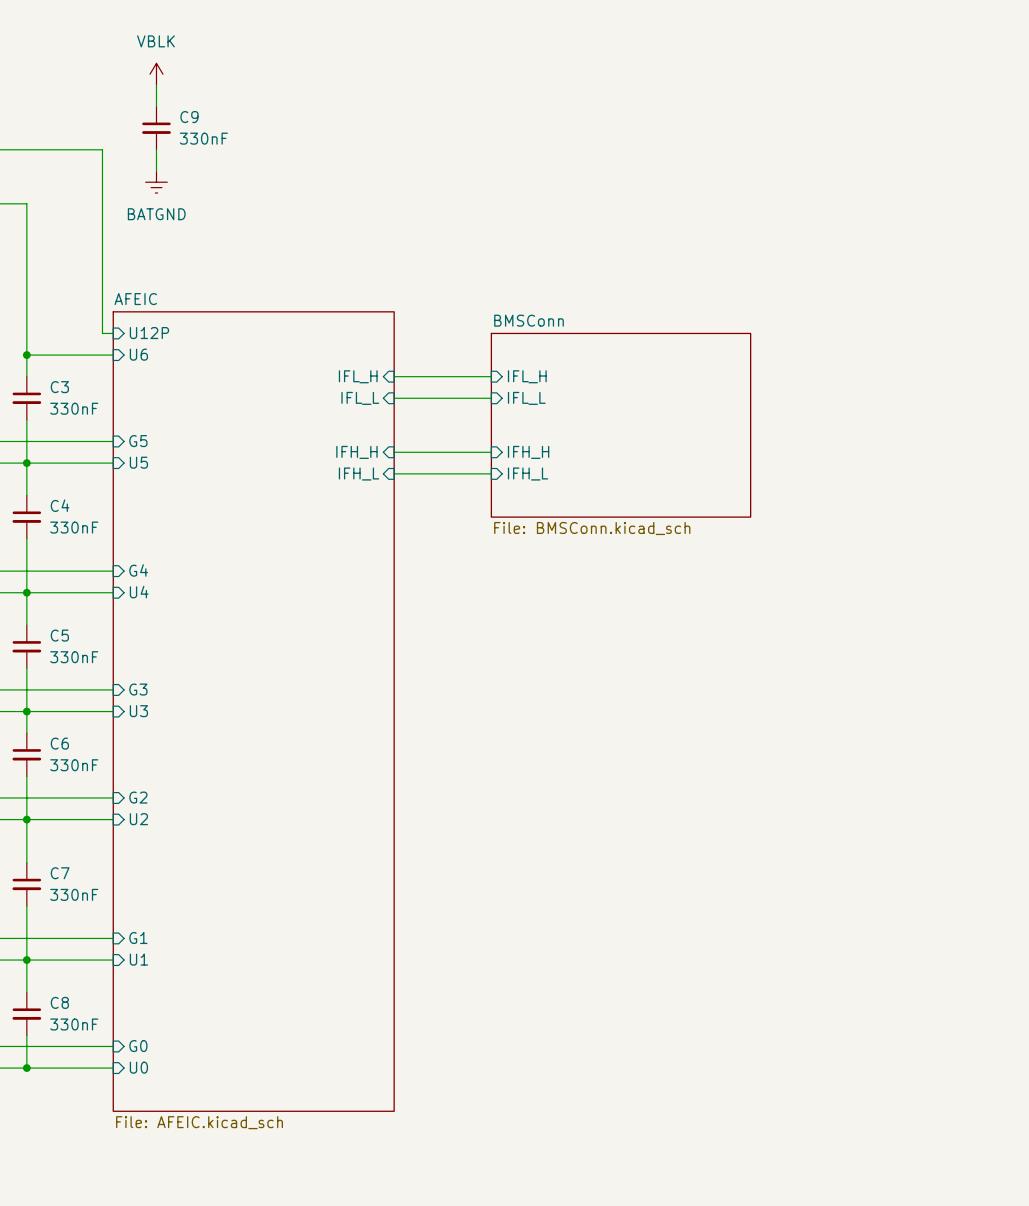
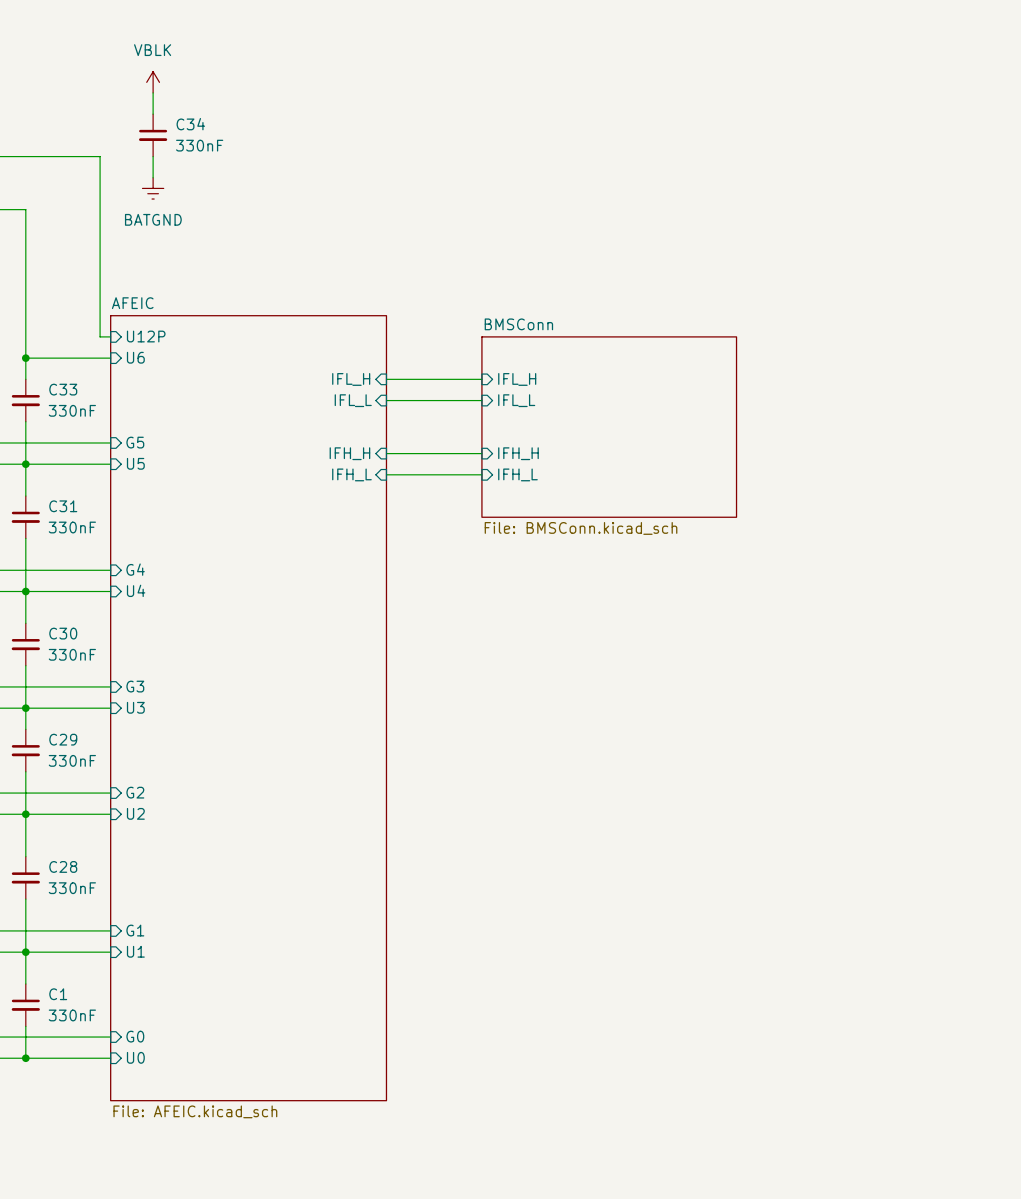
C9 name: C9 (189, 117) -> C34 (190, 124)
C3 name: C3 (59, 387) -> C33 (63, 389)
C4 name: C4 (60, 505) -> C31 (63, 506)
C5 name: C5 (59, 635) -> C30 (63, 633)
C6 name: C6 (59, 743) -> C29 (63, 739)
C7 name: C7 (60, 873) -> C28 (63, 866)
C8 name: C8 (59, 1002) -> C1 (58, 994)

